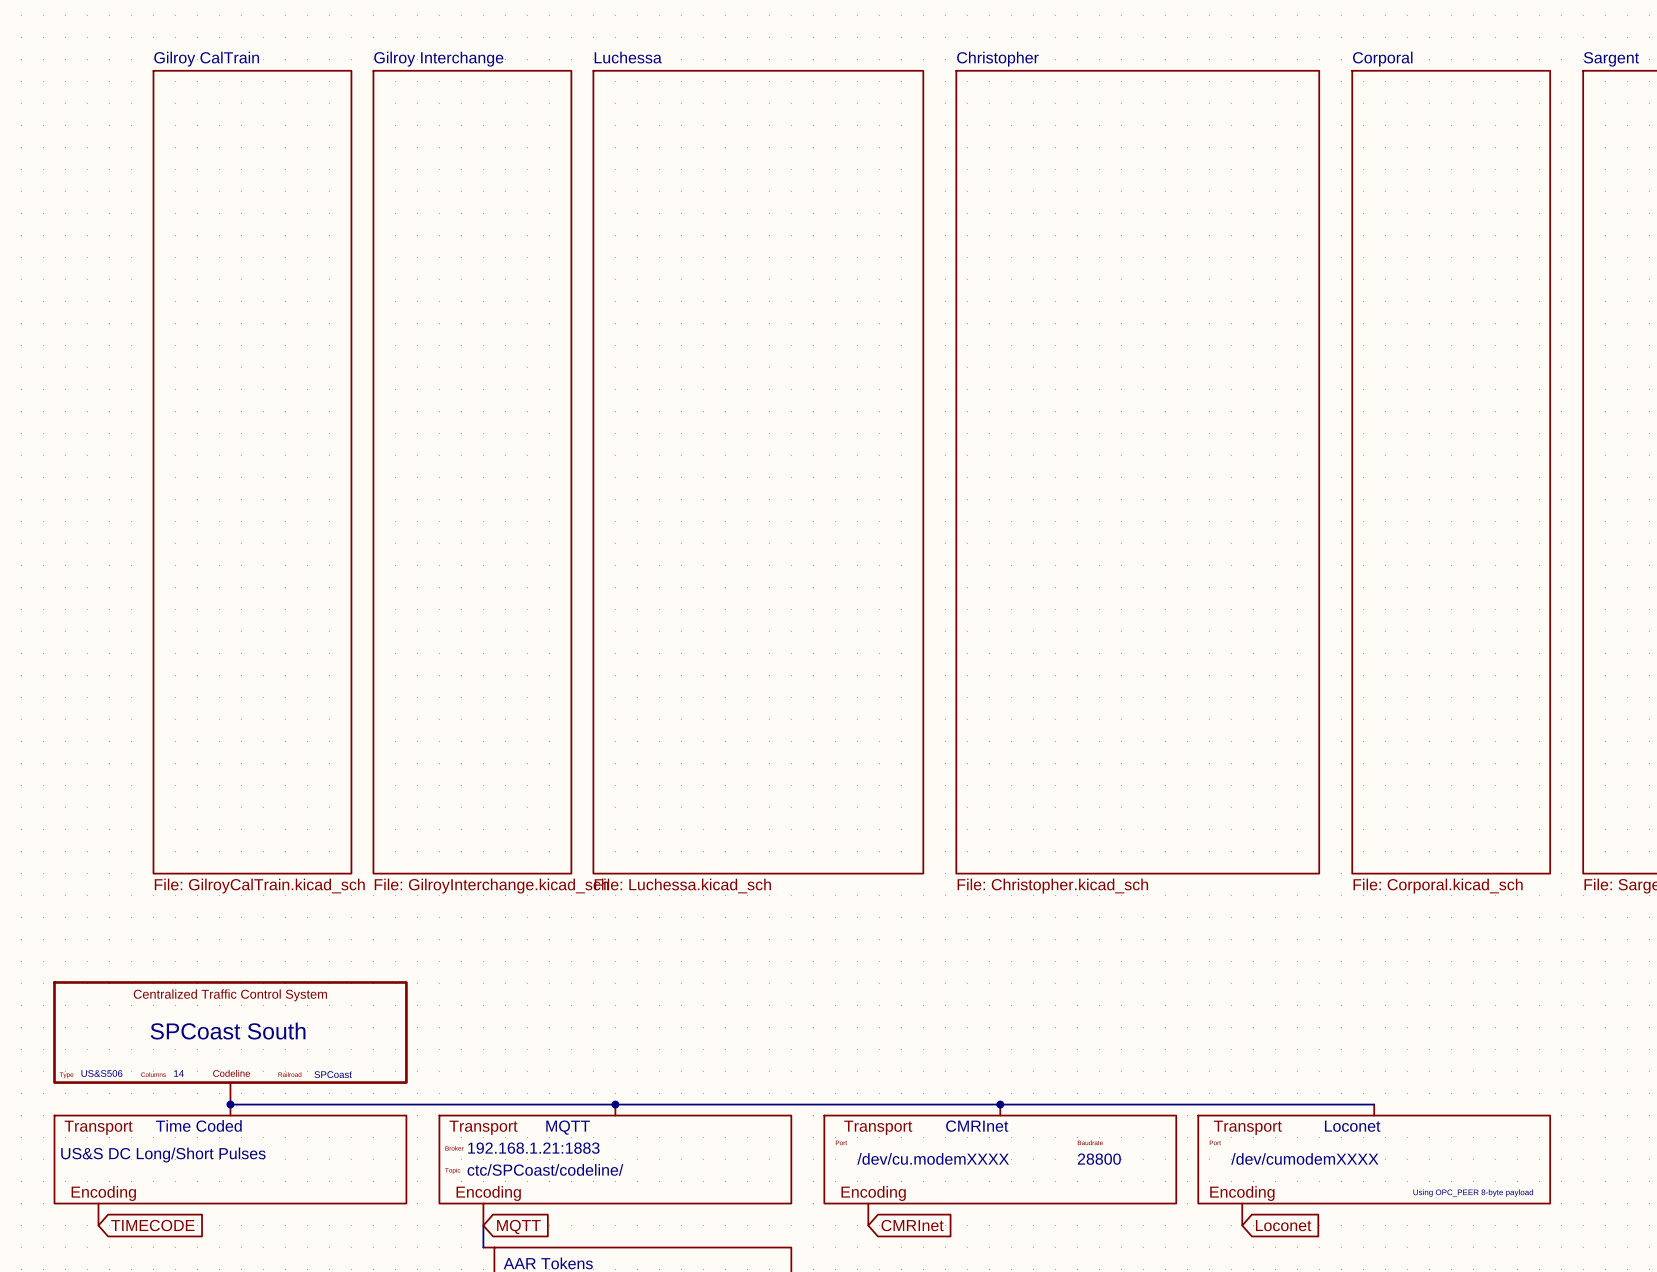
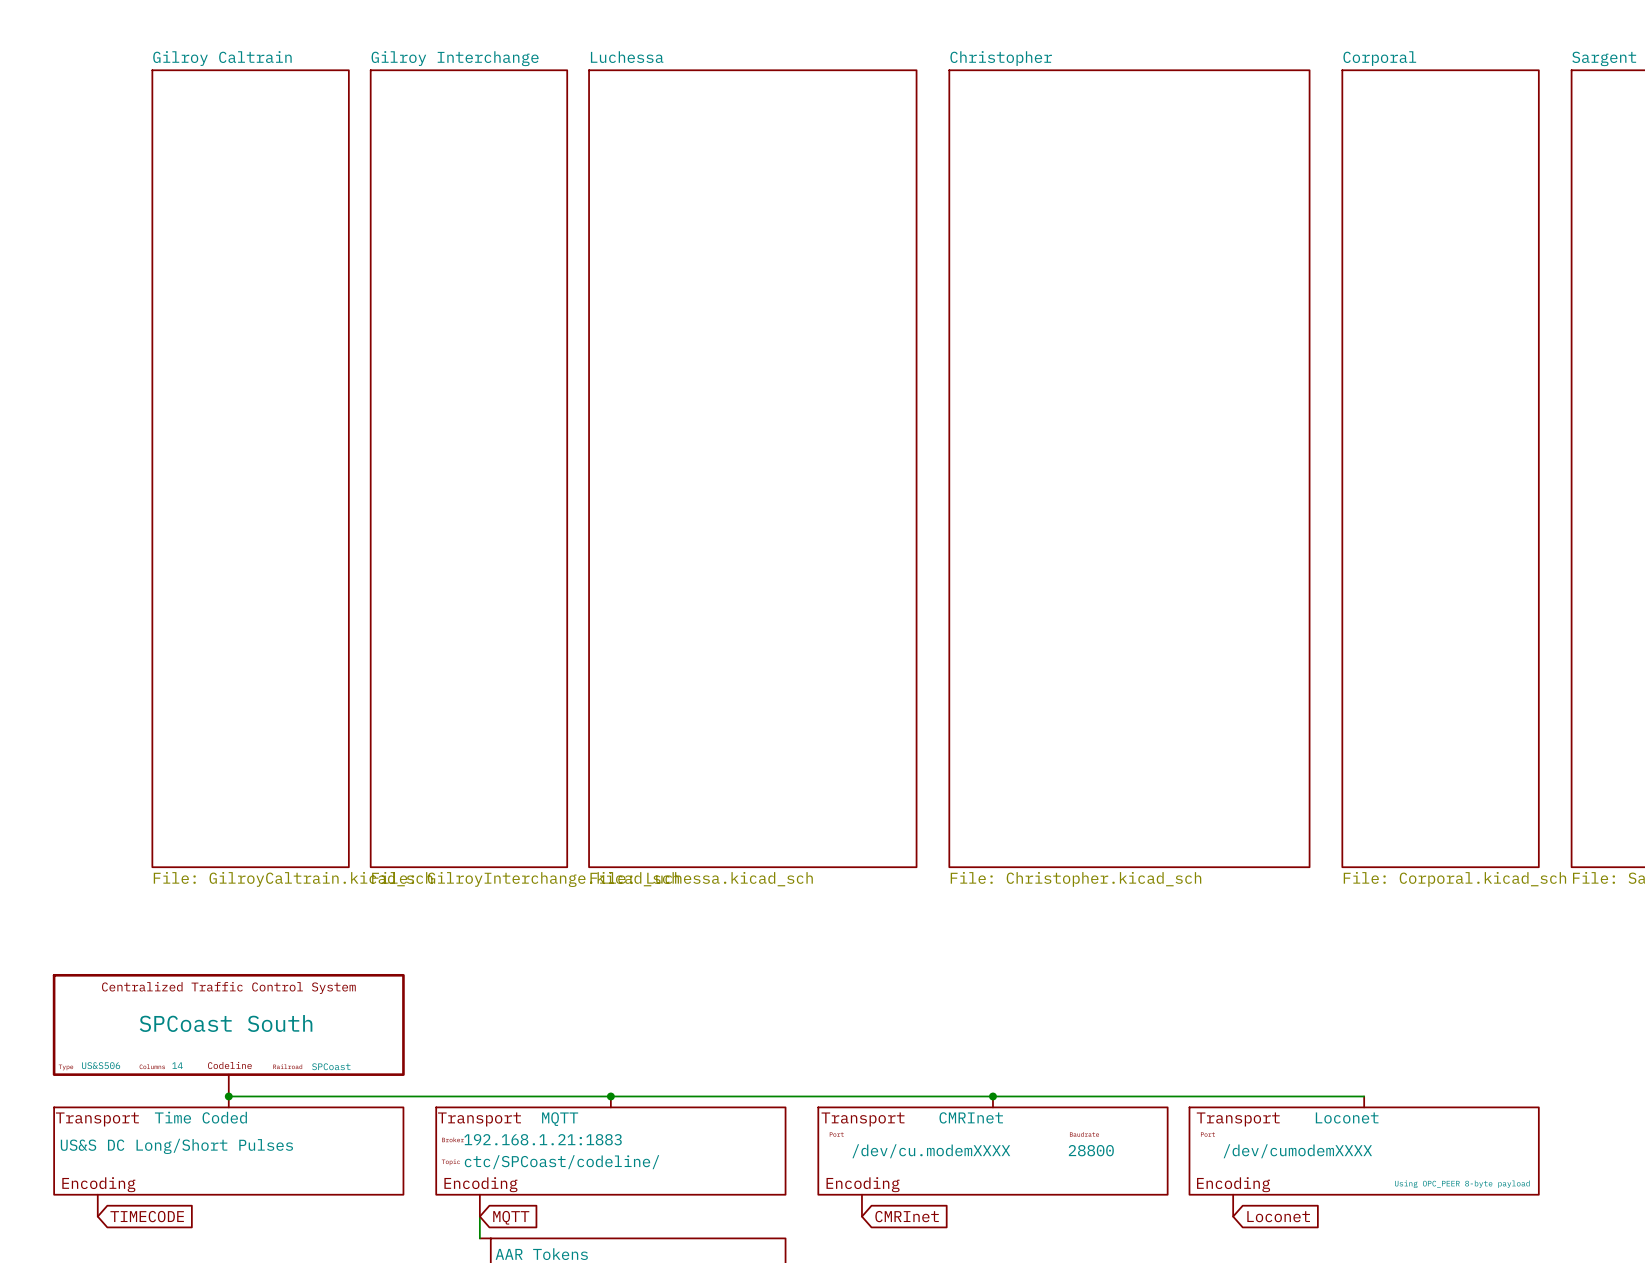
sheet Gilroy CalTrain name: Gilroy CalTrain (206, 59) -> Gilroy Caltrain (222, 58)
sheet Gilroy CalTrain value: File: GilroyCalTrain.kicad_sch (259, 886) -> File: GilroyCaltrain.kicad_sch (293, 879)

